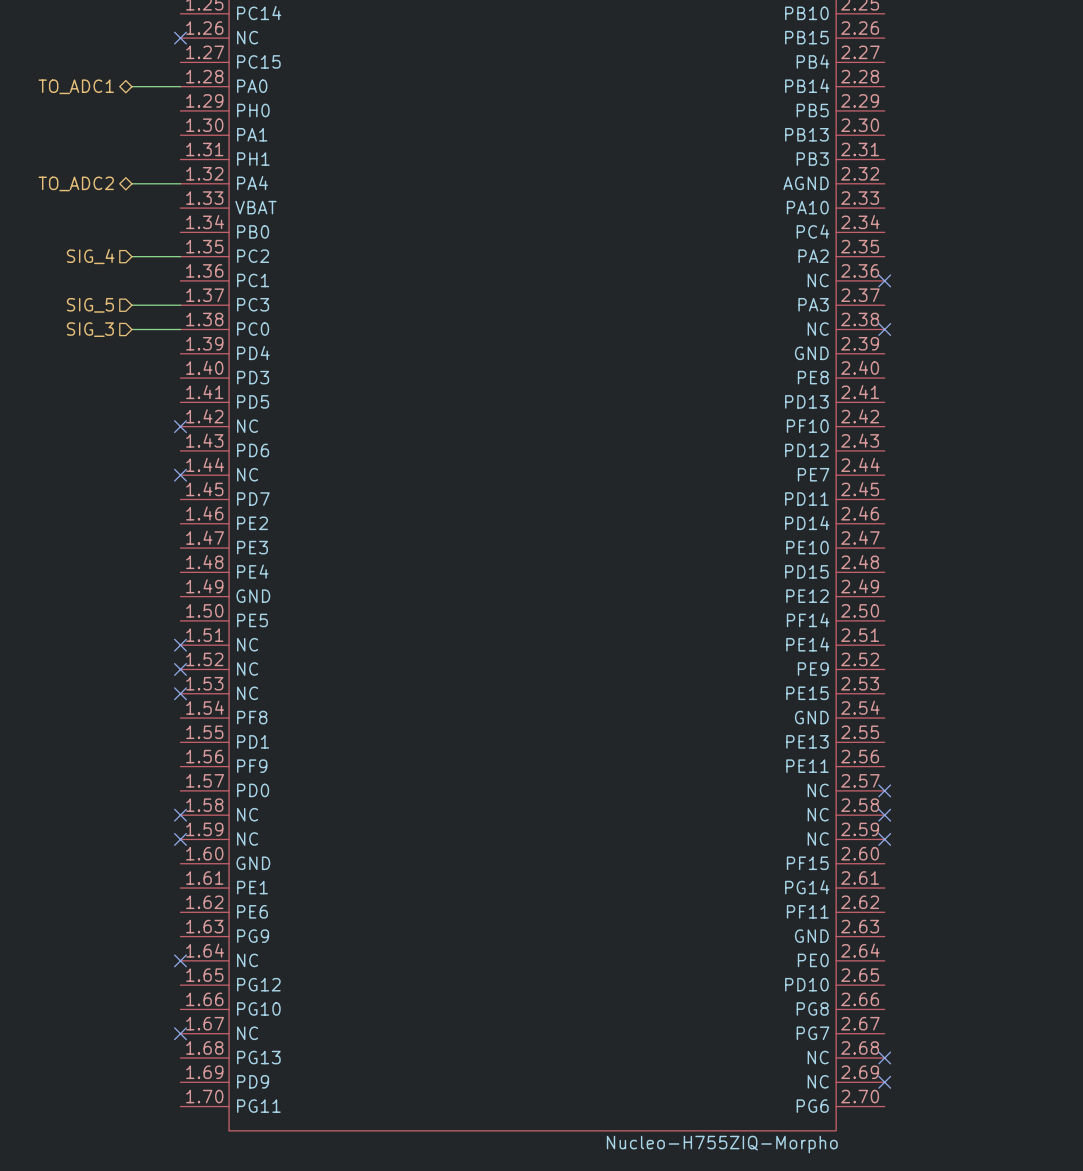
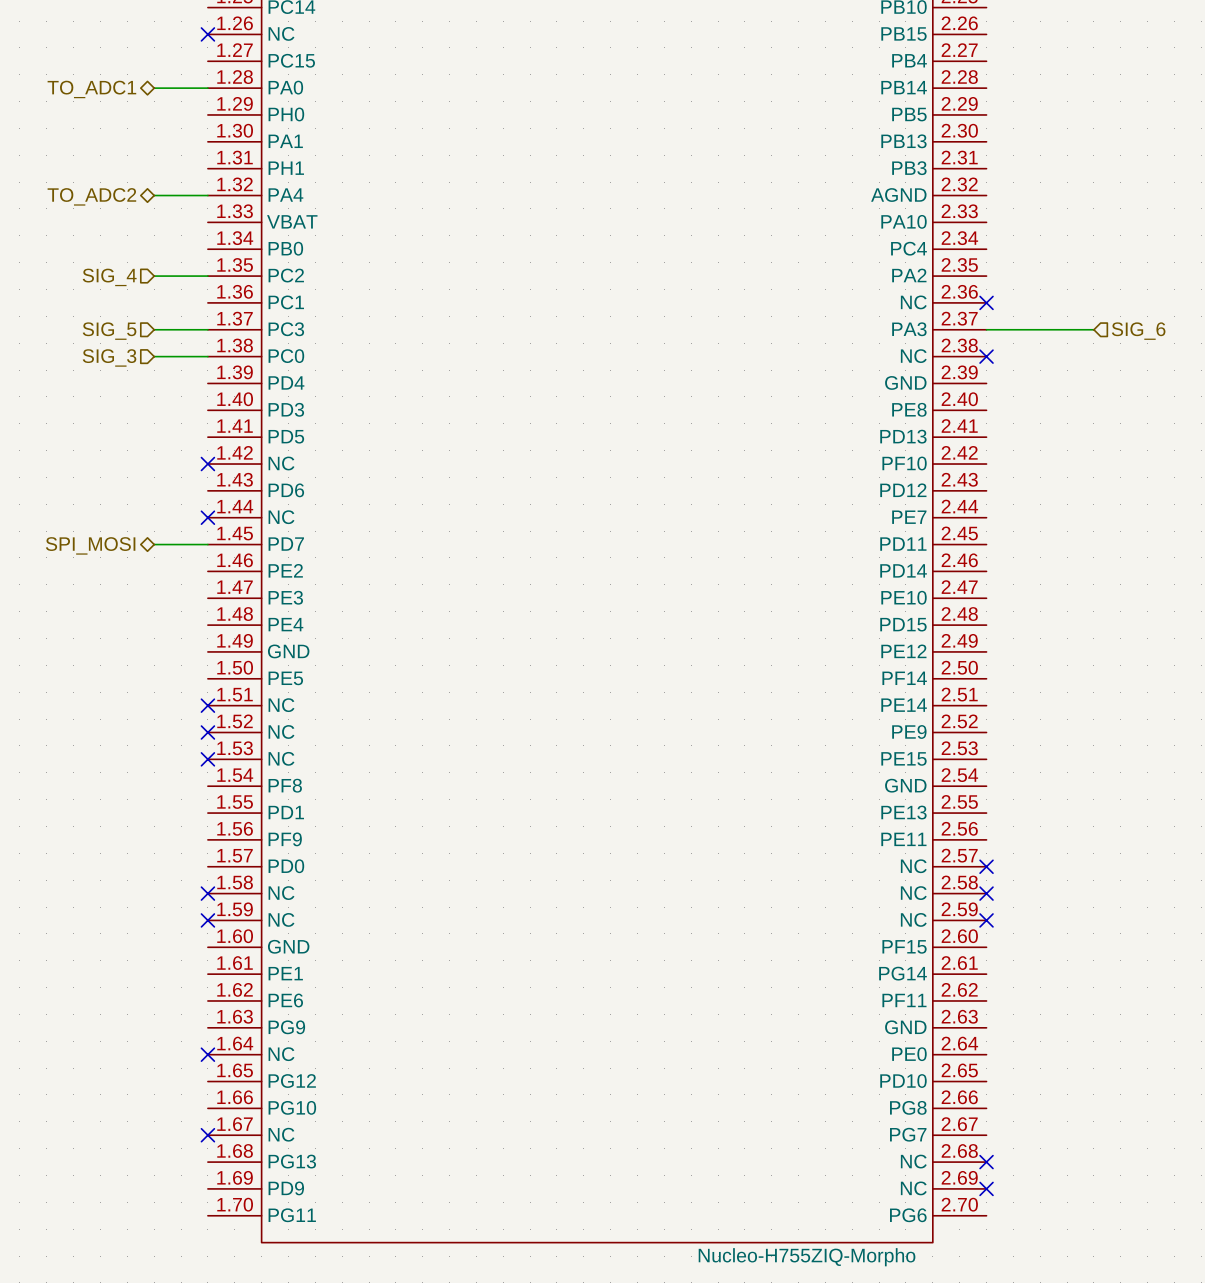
wire: none -> (986, 329) (1093, 329)
hierarchical label: none -> SIG_6 (1138, 331)
hierarchical label: none -> SPI_MOSI (90, 545)
wire: none -> (154, 544) (207, 544)

